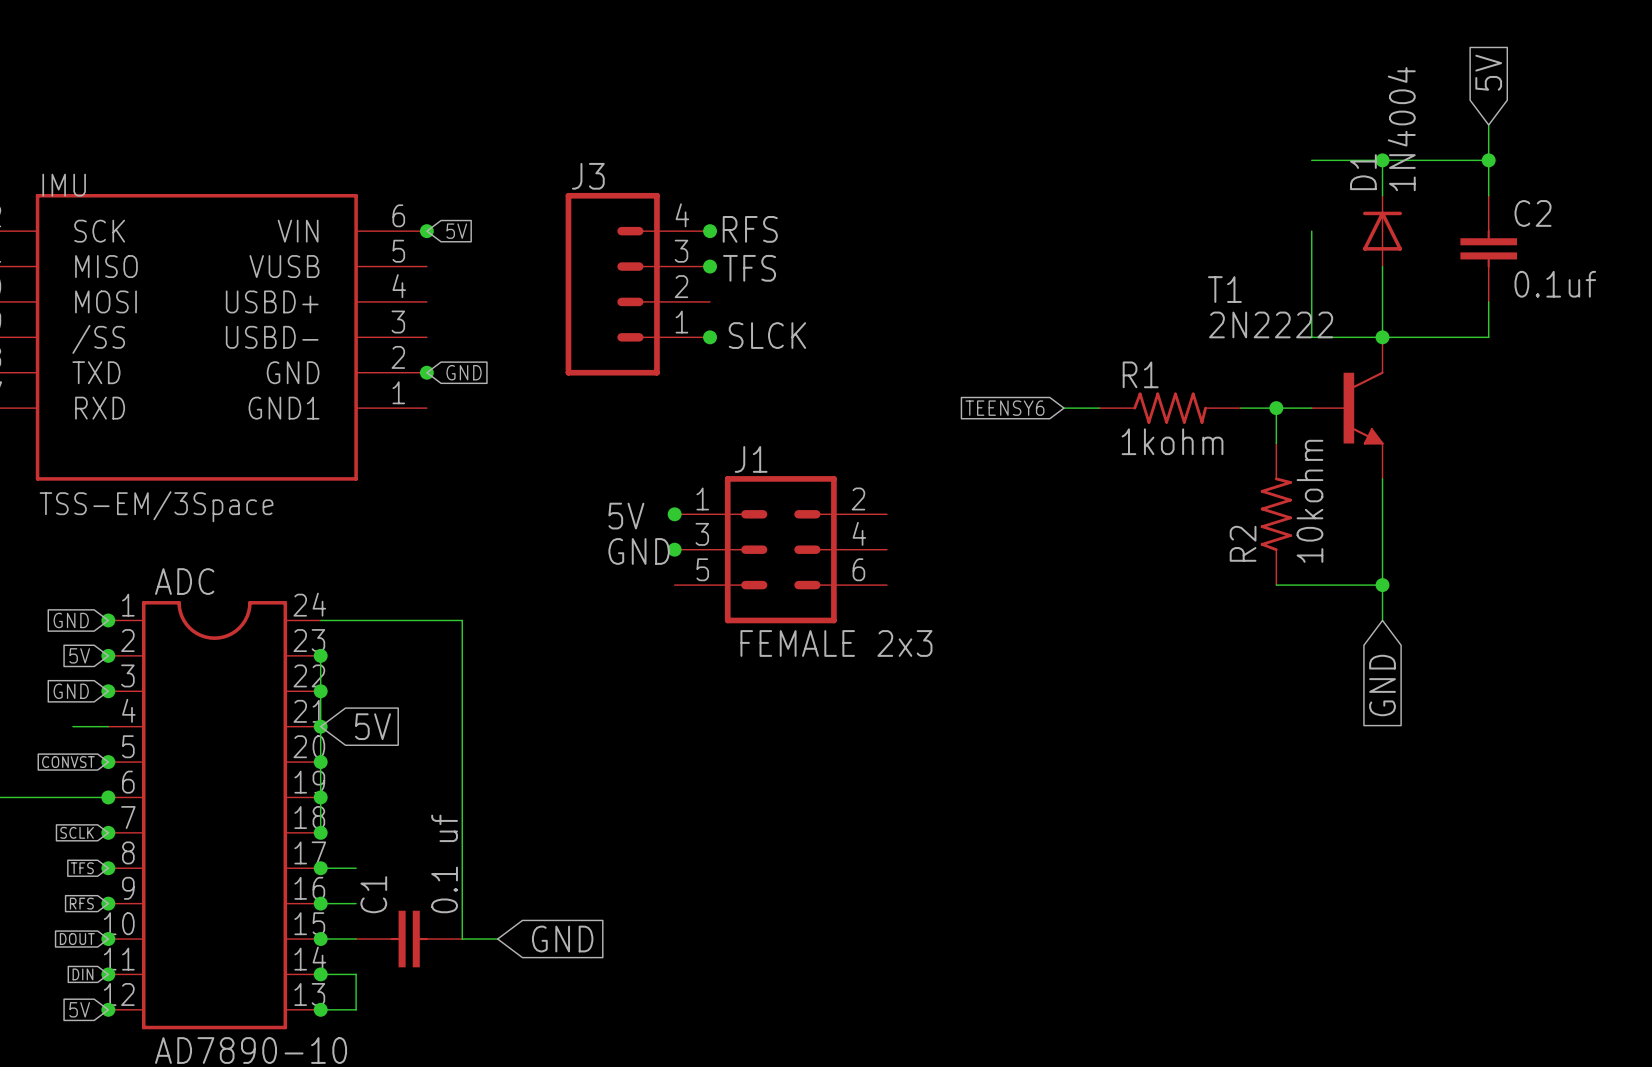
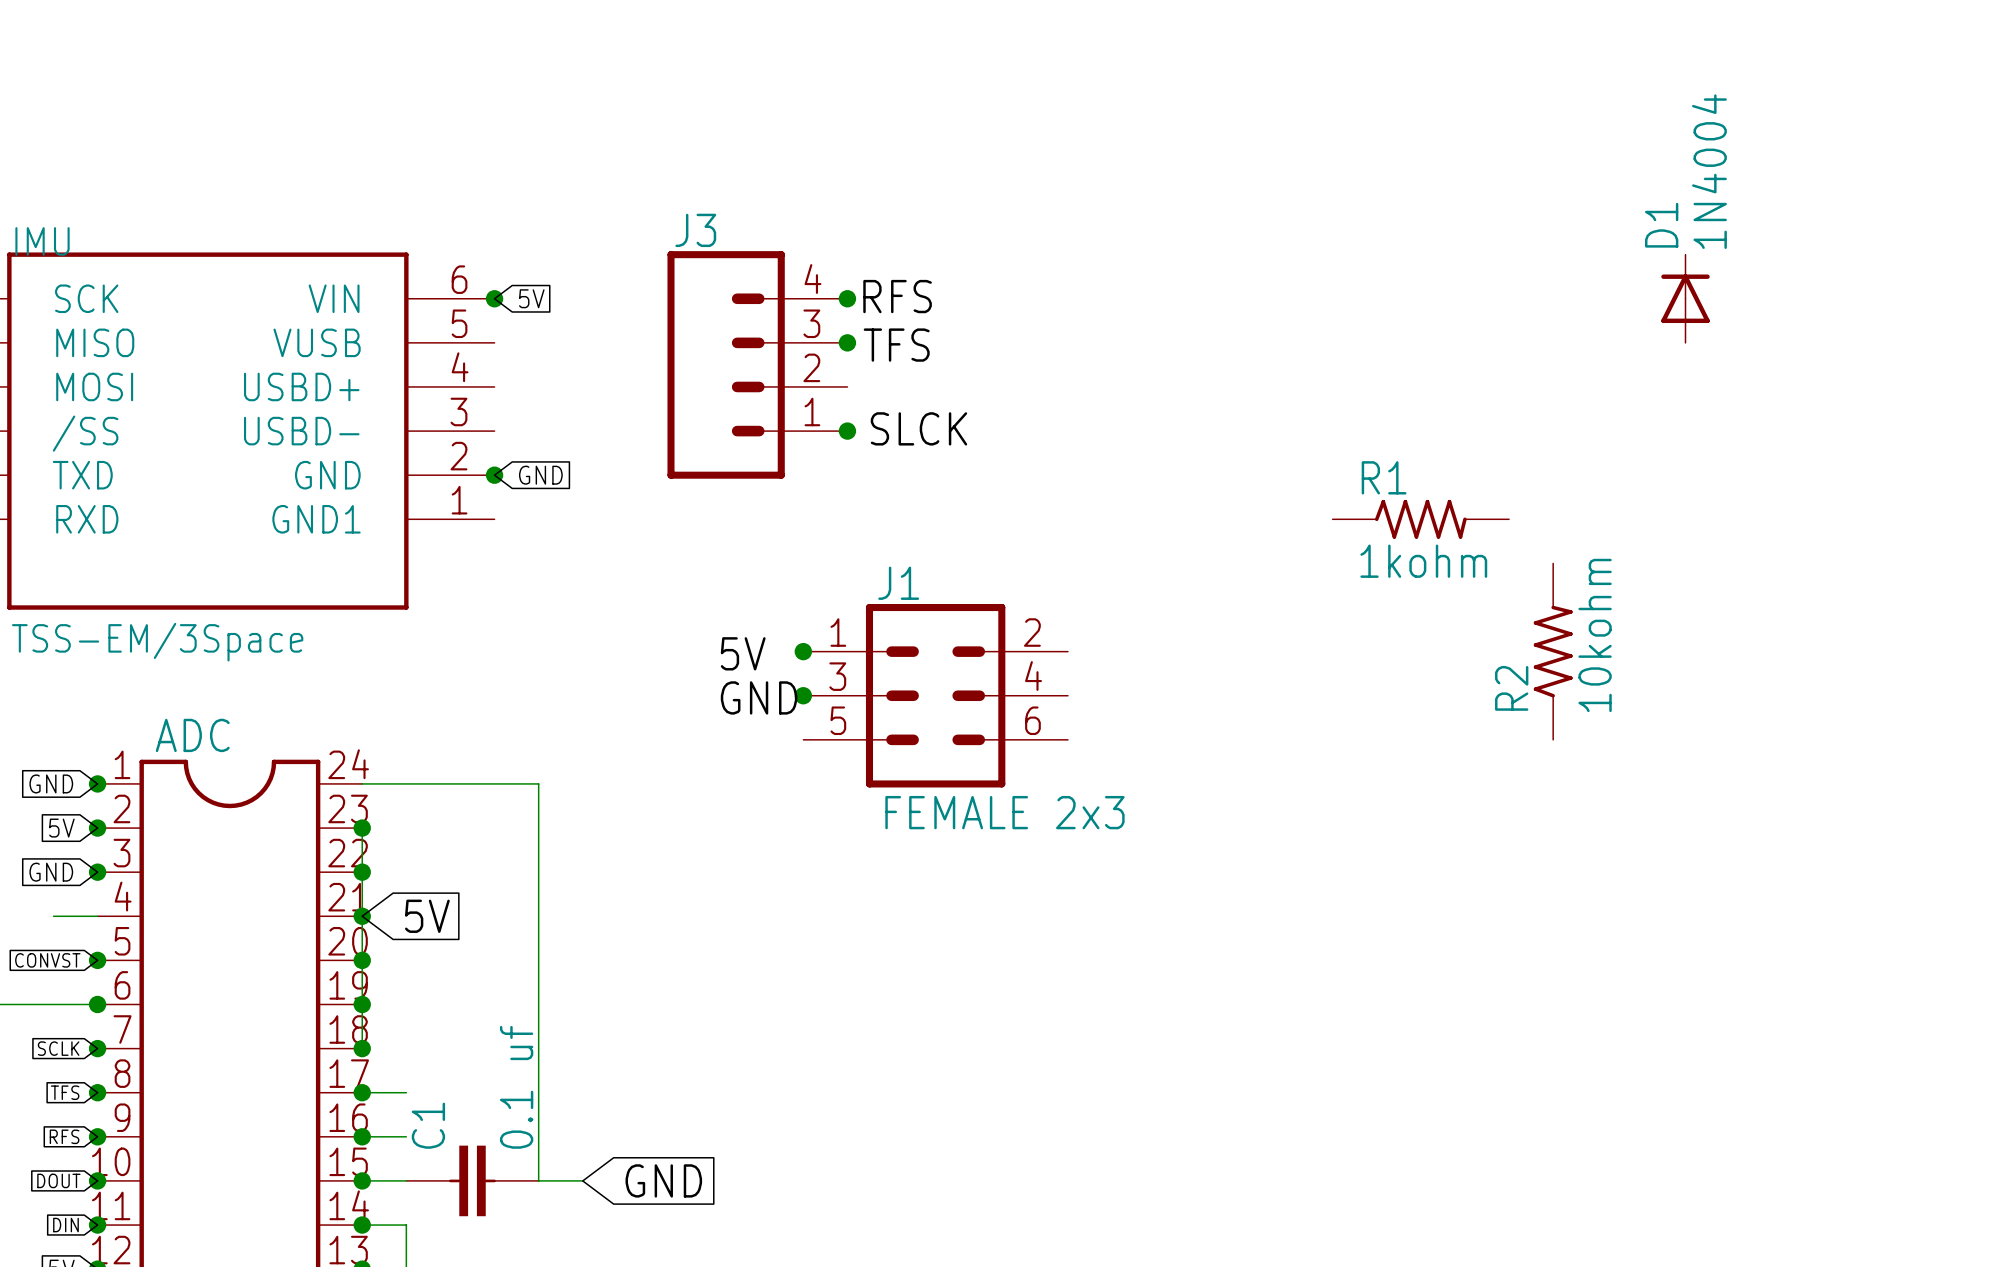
global label: 5V (1488, 72) -> none
wire: (1488, 124) (1488, 195) -> none
wire: (1311, 160) (1488, 160) -> none
wire: (1382, 160) (1382, 195) -> none
junction: (1382, 160) -> none
junction: (1488, 160) -> none
wire: (1311, 231) (1311, 337) (1488, 337) (1488, 301) -> none
C2: 0.1uf (1488, 248) -> none
wire: (1382, 266) (1382, 337) -> none
junction: (1382, 337) -> none
global label: TEENSY6 (1004, 408) -> none
wire: (1063, 408) (1099, 408) -> none
wire: (1240, 408) (1311, 408) -> none
wire: (1276, 408) (1276, 443) -> none
junction: (1276, 408) -> none
T1: 2N2222 (1347, 408) -> none
wire: (1382, 478) (1382, 620) -> none
wire: (1276, 585) (1382, 585) -> none
junction: (1382, 585) -> none
global label: GND (1382, 685) -> none

